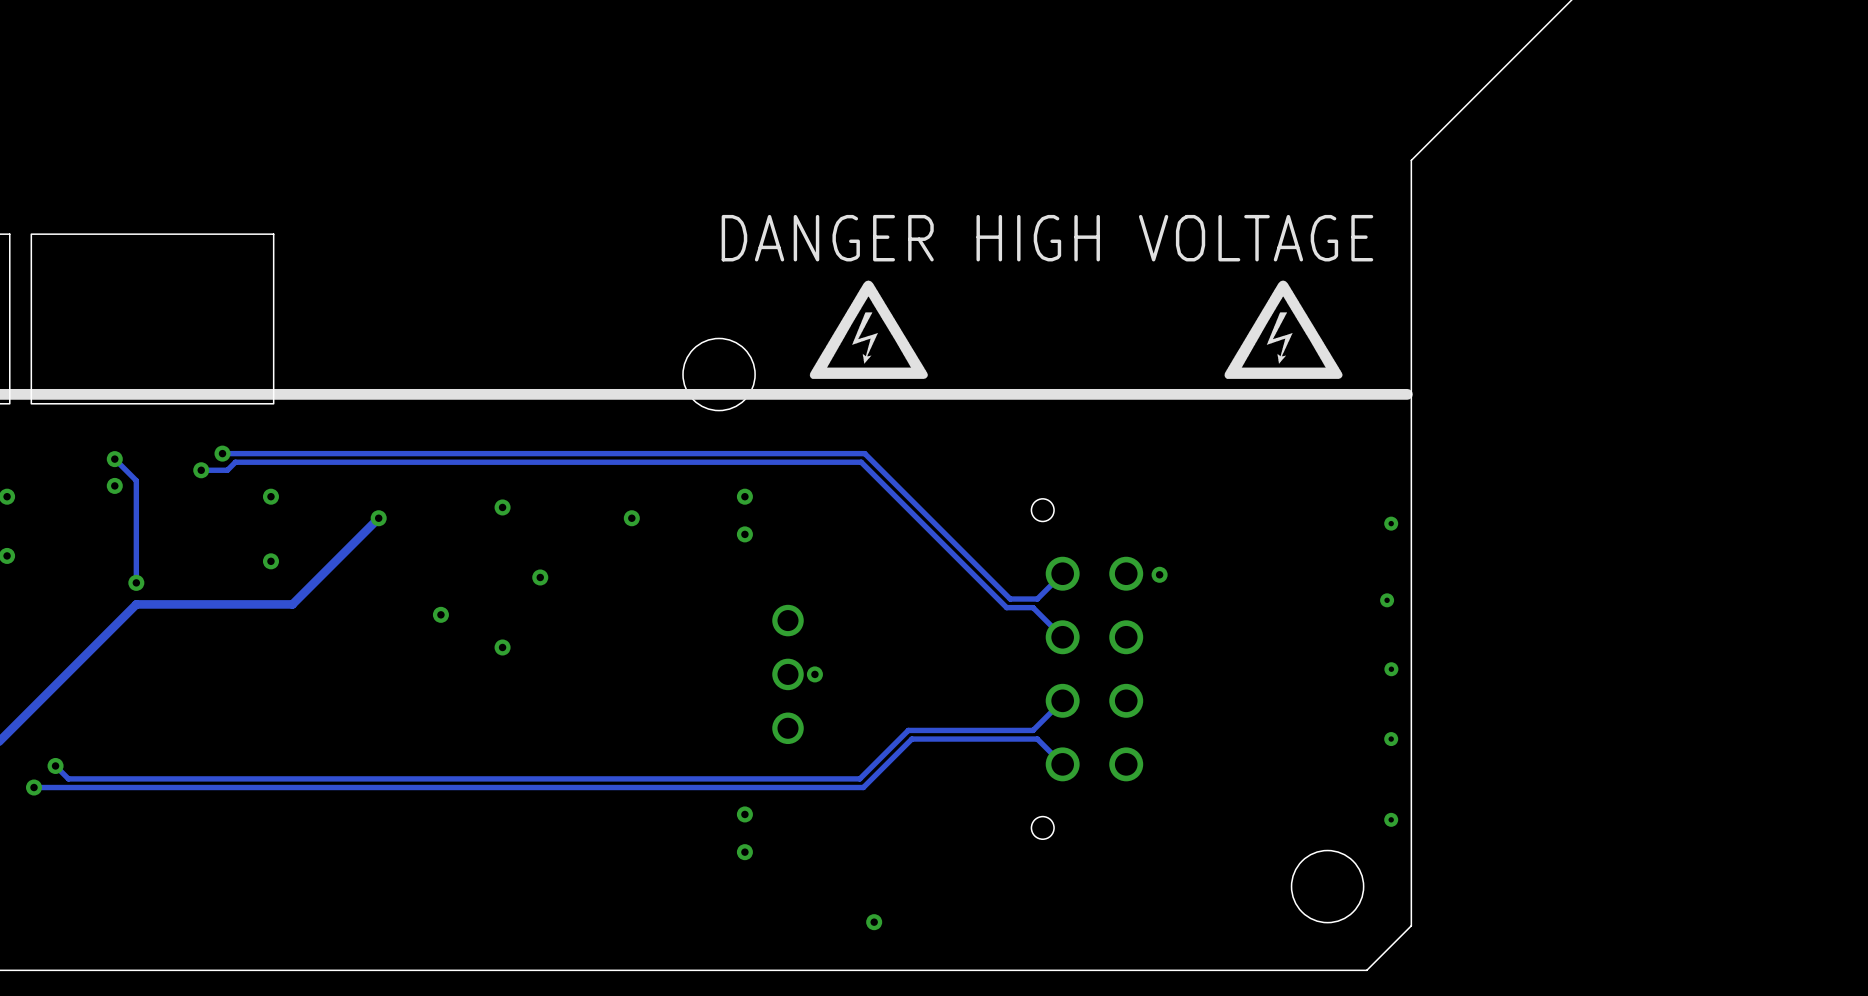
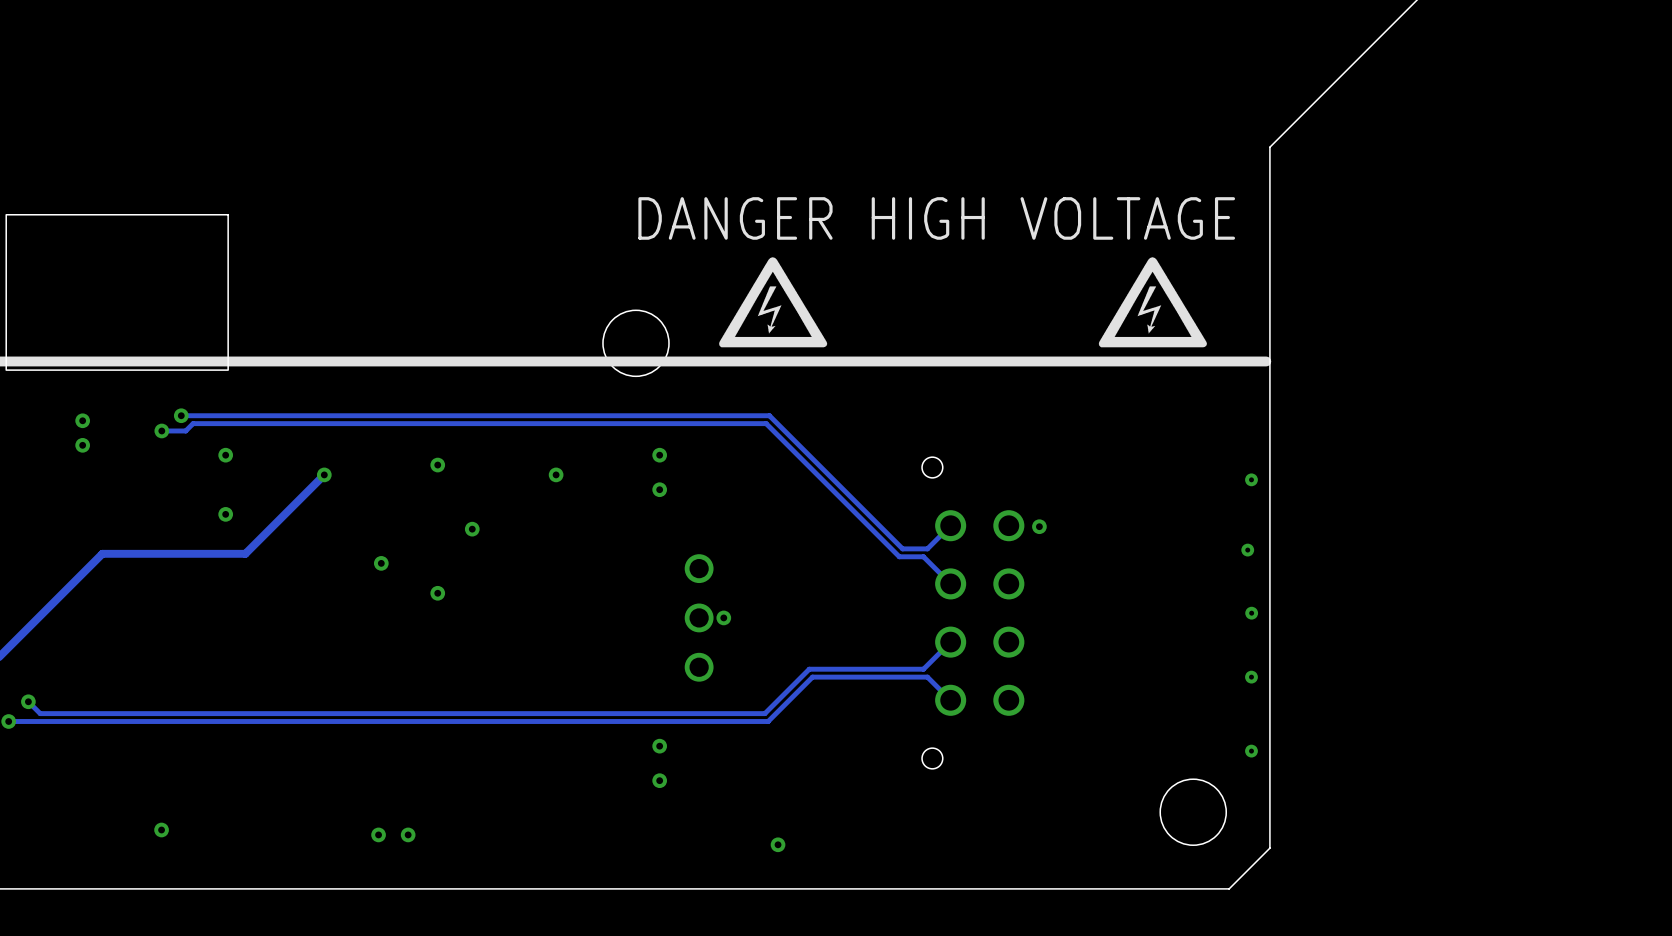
track: (114, 459) (136, 480) (136, 582) -> none
via: (136, 582) -> none
via: none -> (161, 830)
via: none -> (378, 834)
via: none -> (408, 834)

